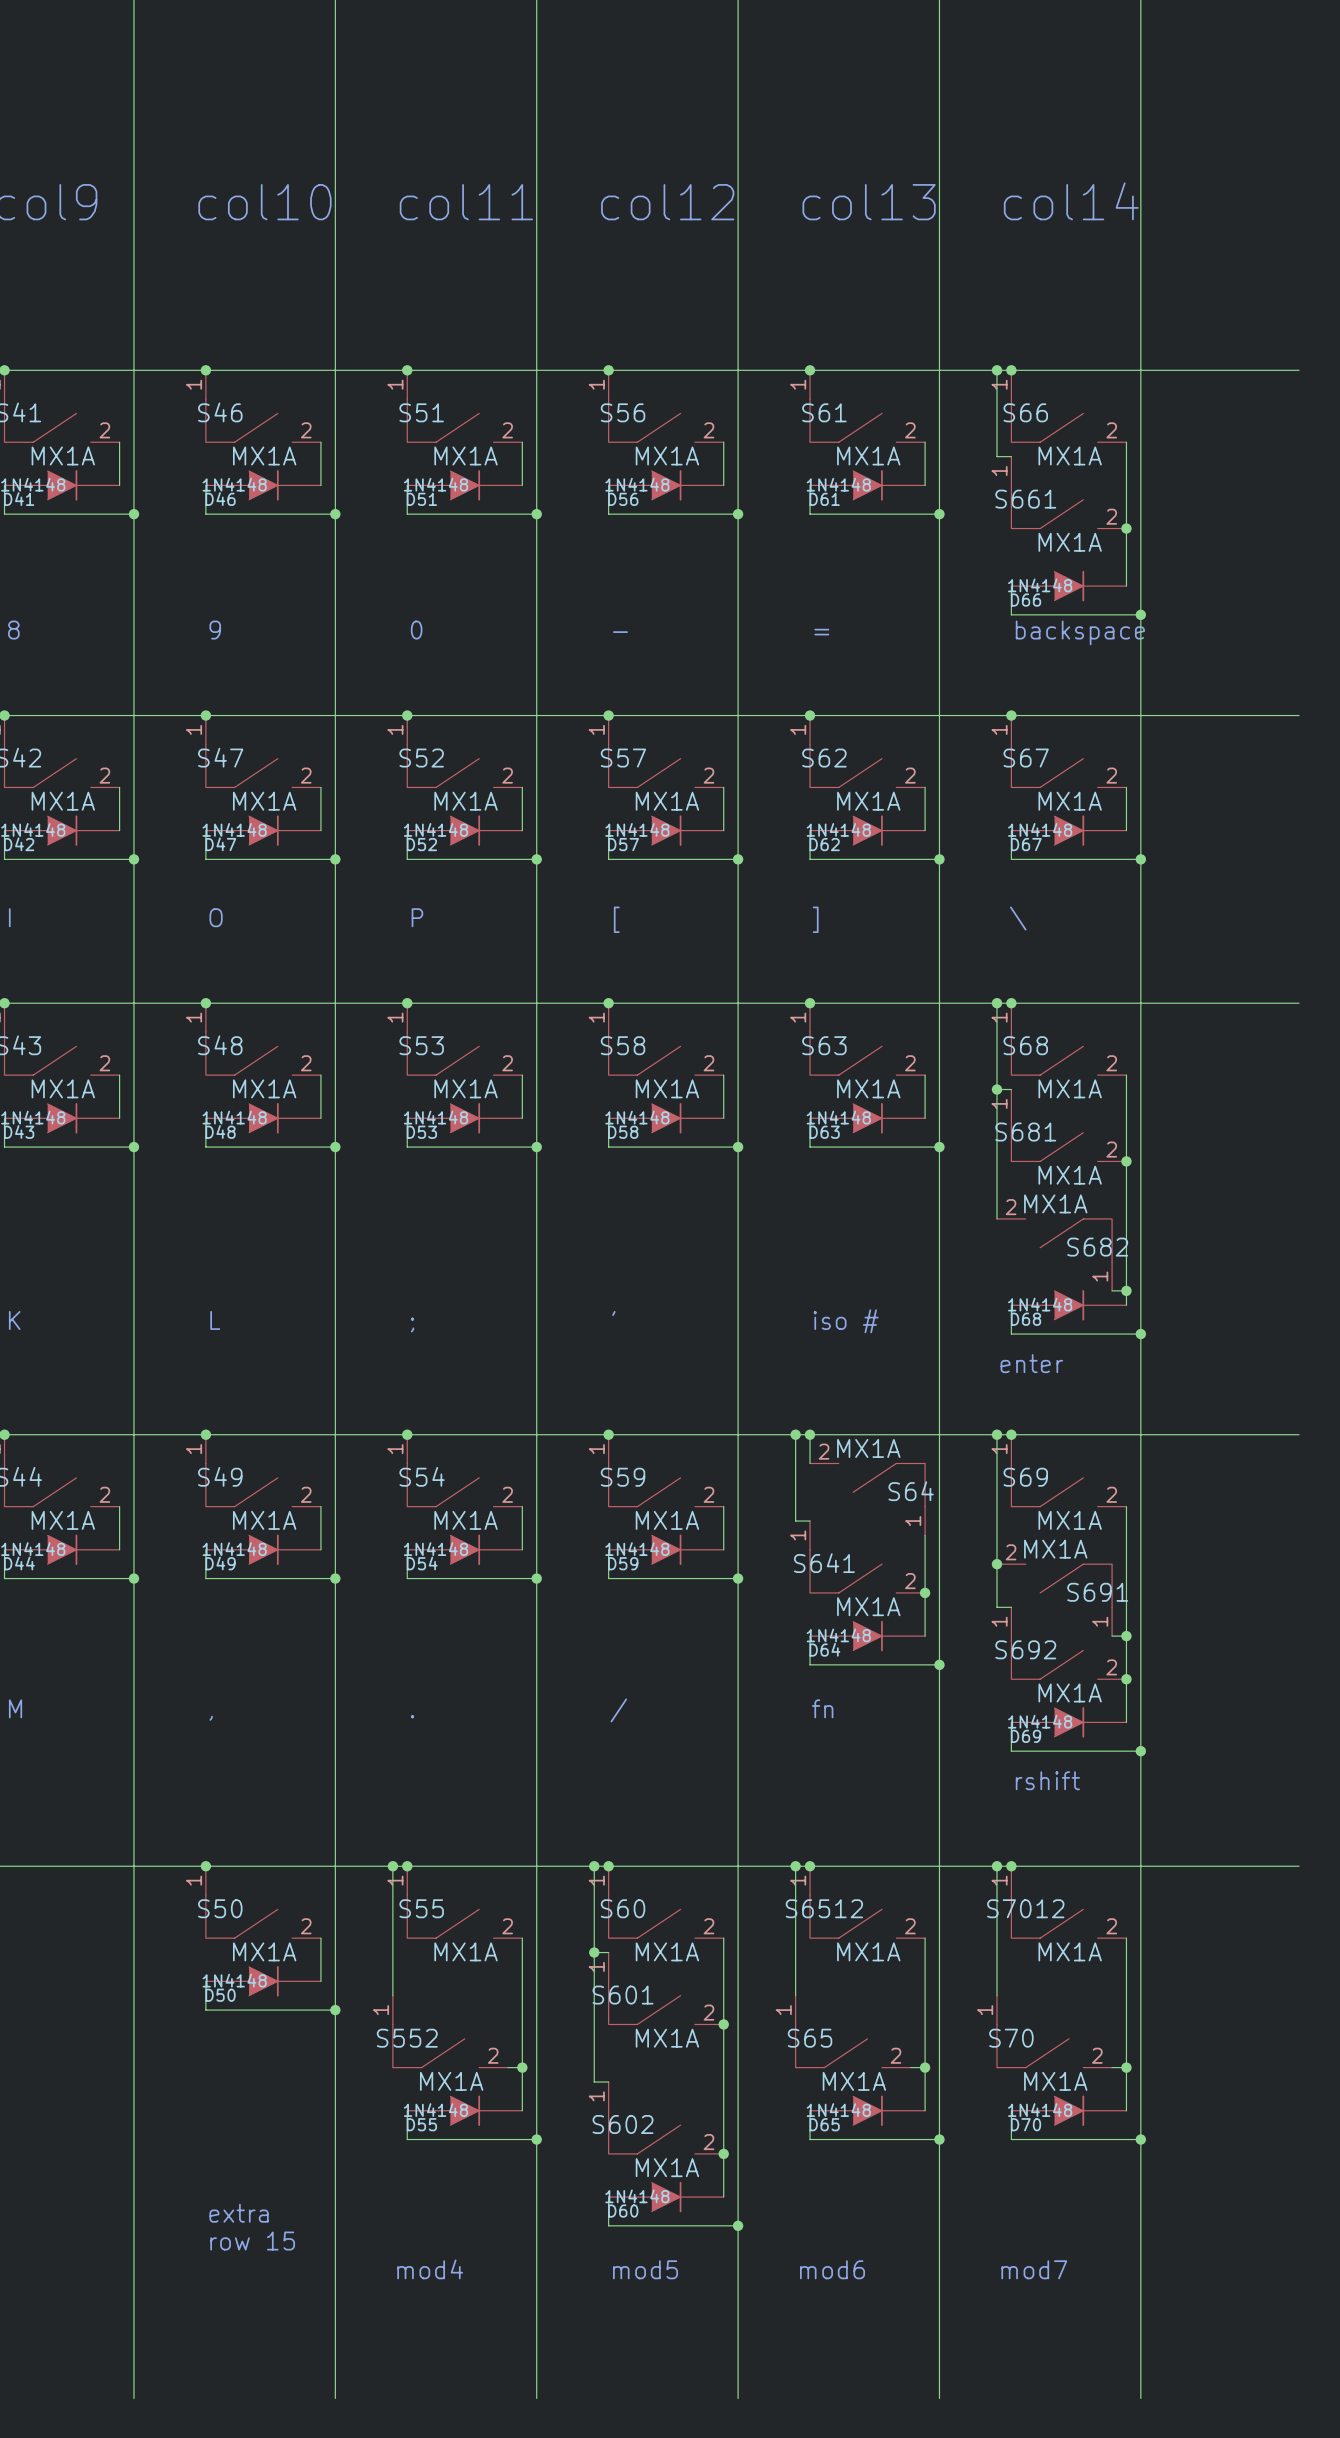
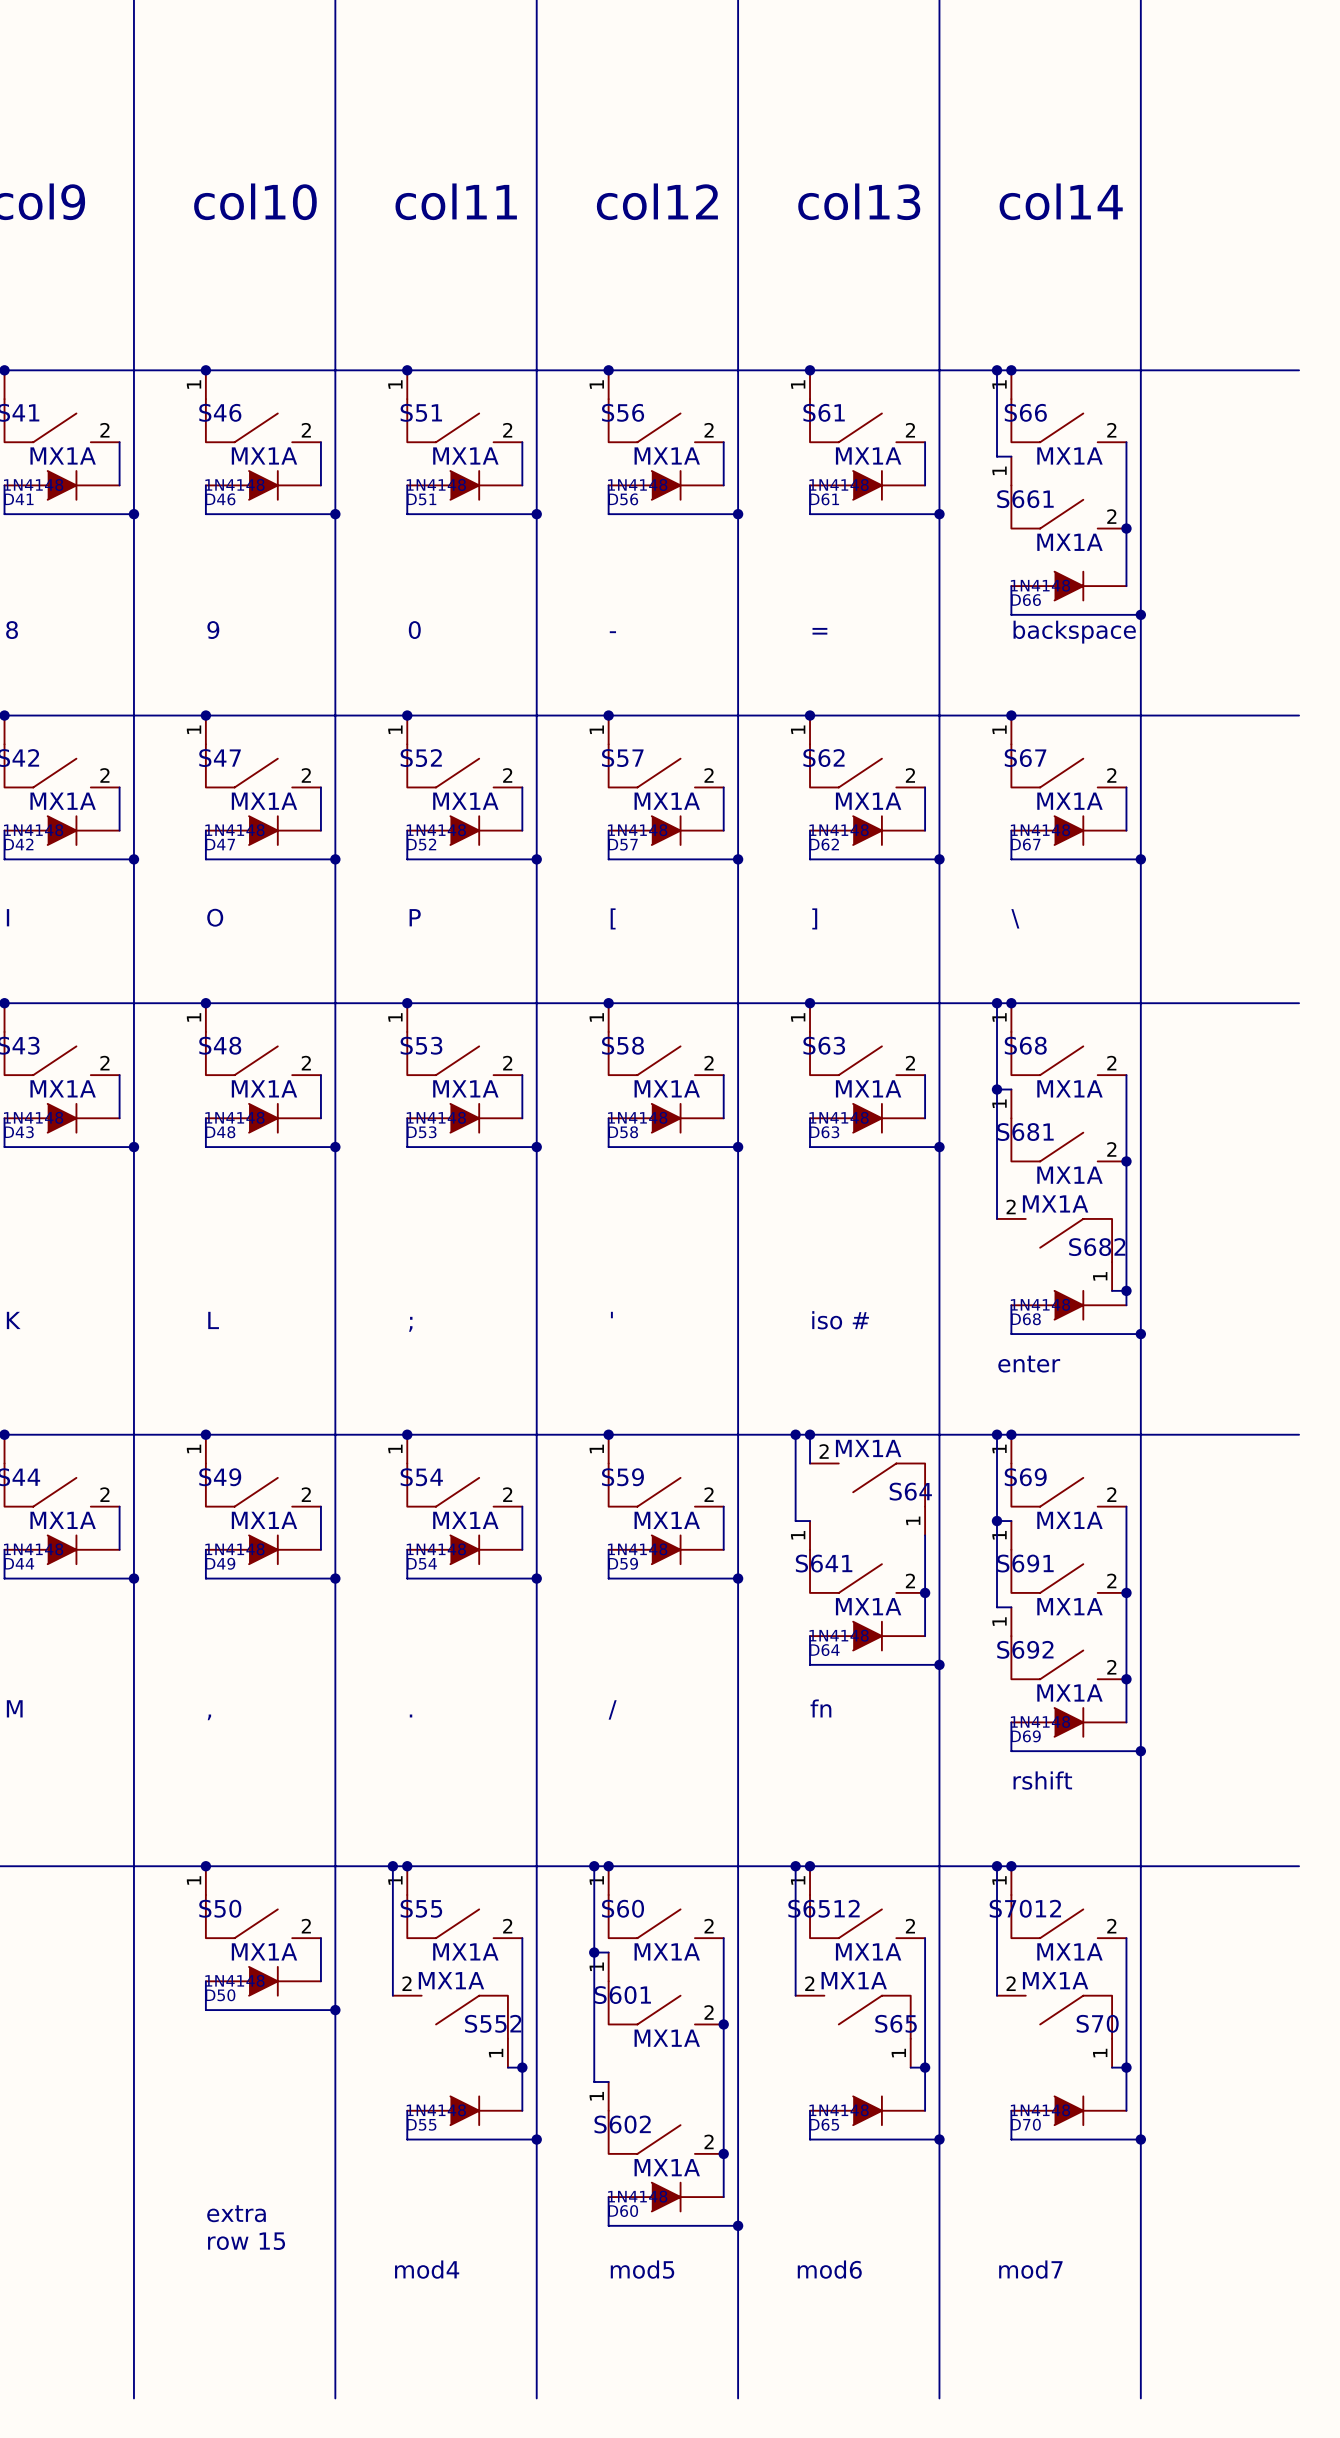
junction position: (997, 1564) -> (997, 1521)
S691 rotation: 0° (1076, 1585) -> 180° (1047, 1571)
wire: (1112, 1636) (1126, 1636) -> (997, 1521) (1011, 1521)
junction position: (1126, 1636) -> (1126, 1592)
S552 rotation: 0° (428, 2046) -> 180° (471, 2017)
S65 rotation: 0° (831, 2046) -> 180° (874, 2017)
S70 rotation: 0° (1032, 2046) -> 180° (1076, 2017)

